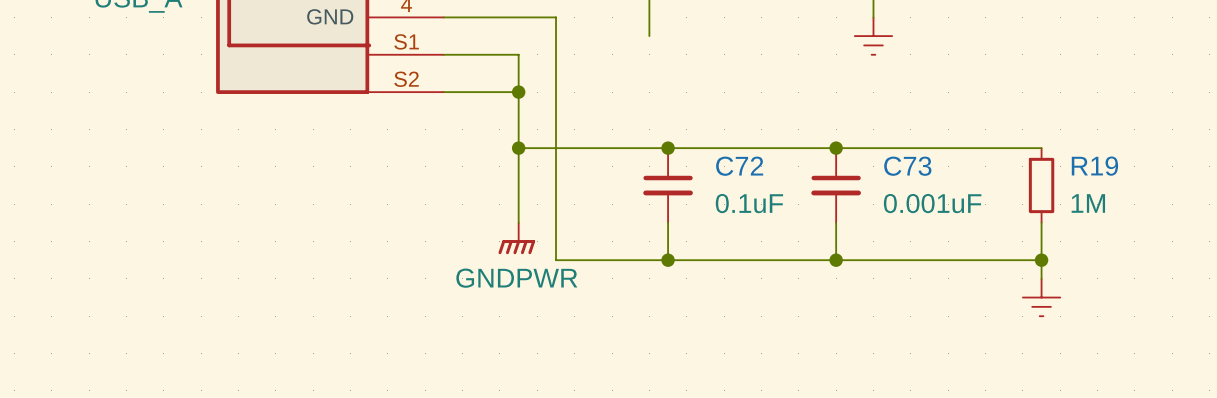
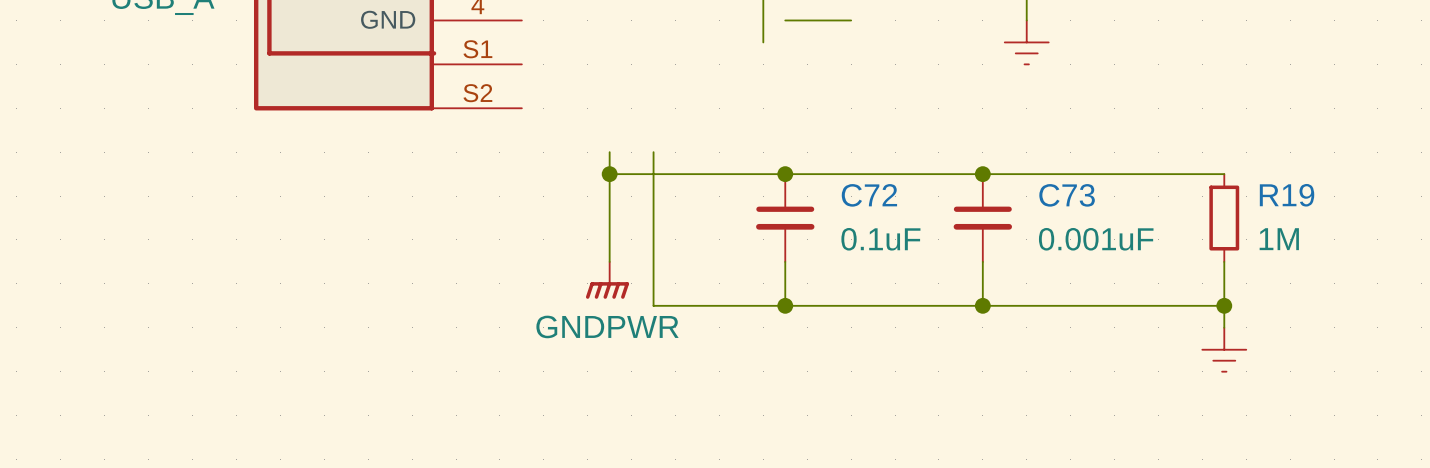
wire: (443, 17) (556, 17) (556, 129) -> none
wire: none -> (785, 20) (851, 20)
wire: (443, 54) (518, 54) (518, 129) -> none
wire: (443, 92) (518, 92) -> none
junction: (518, 92) -> none

